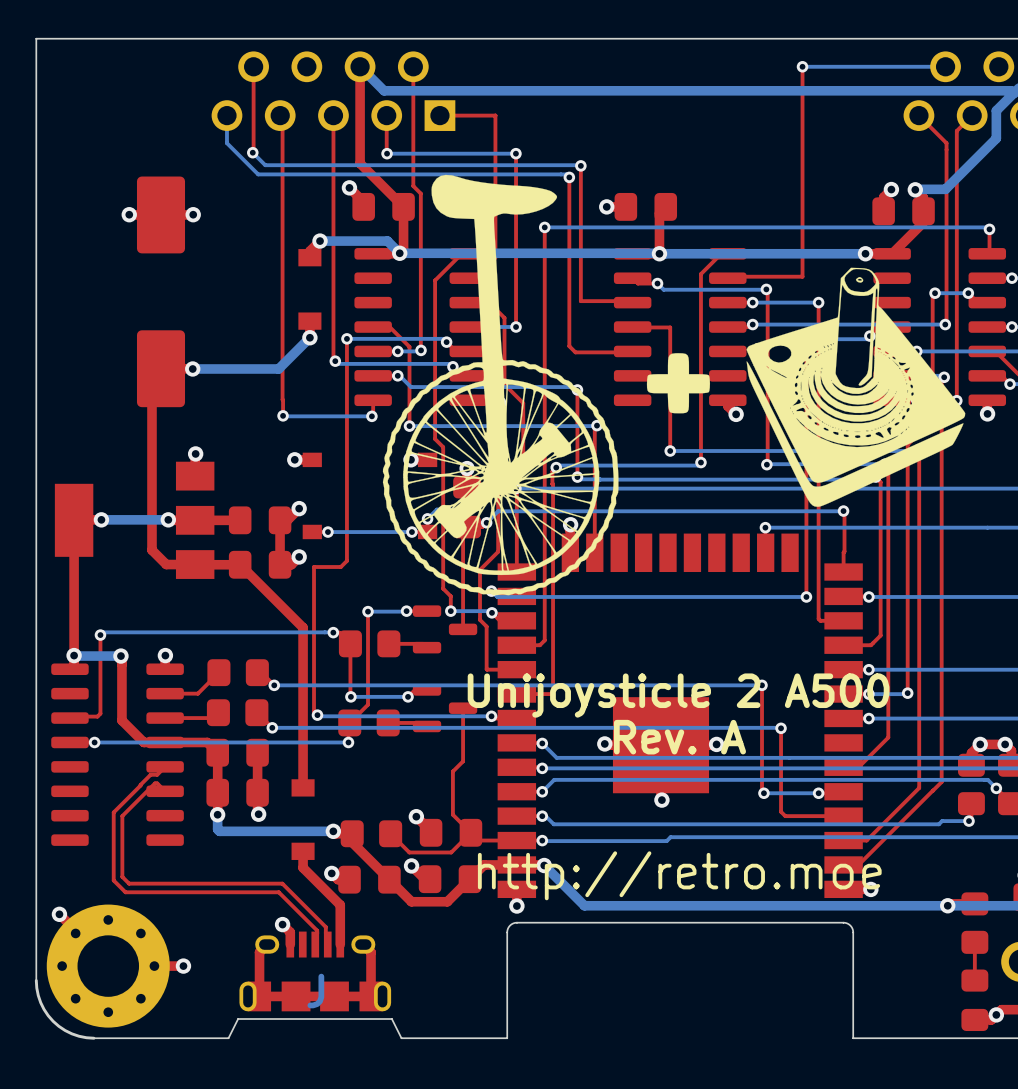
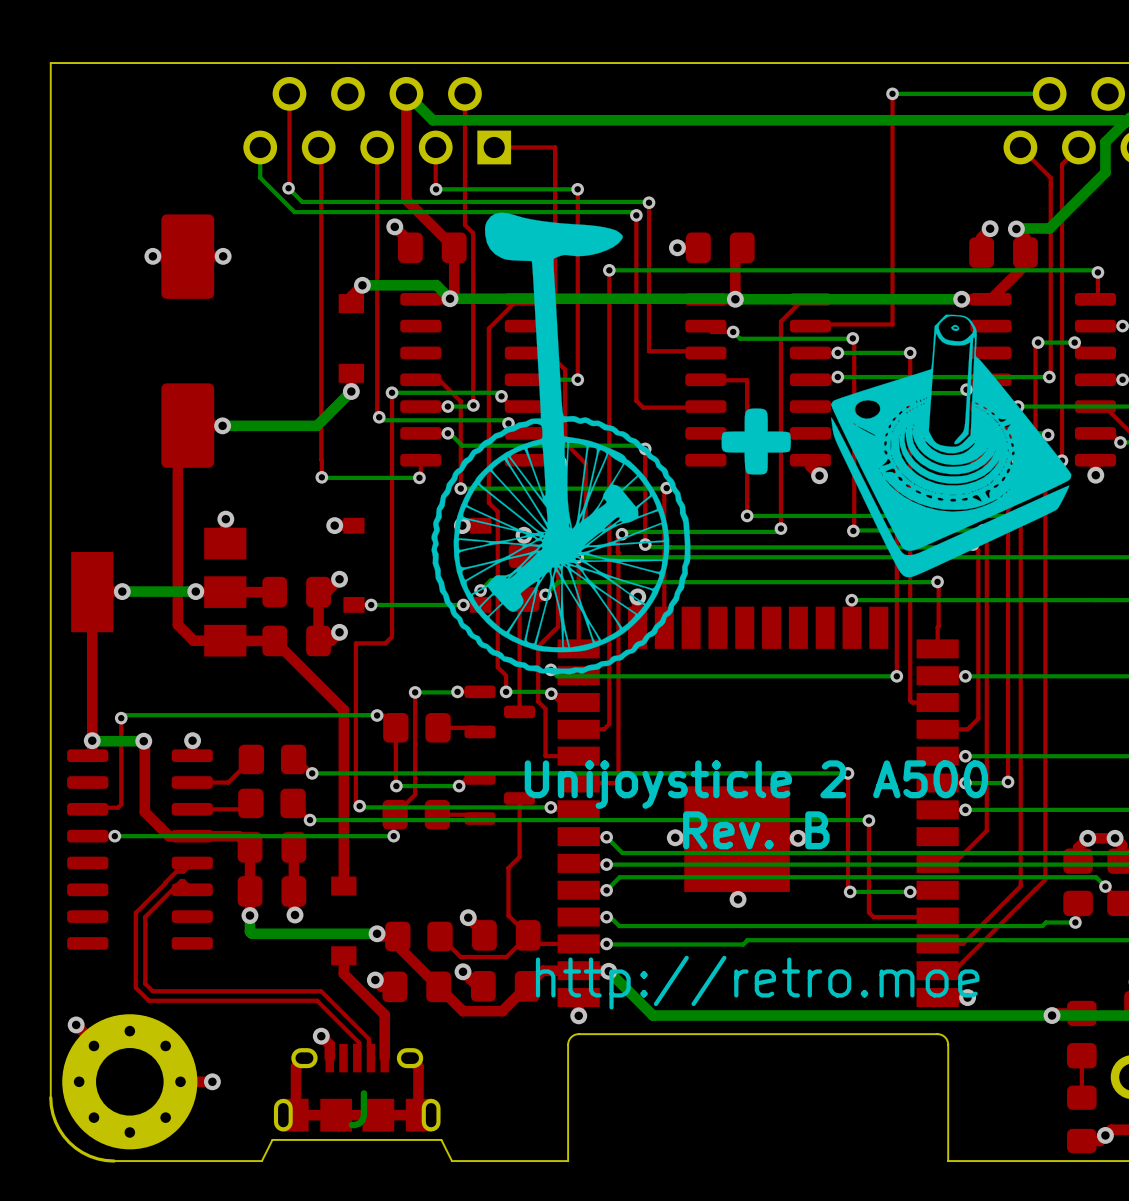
text: Rev. A (679, 737) -> Rev. B (756, 830)

